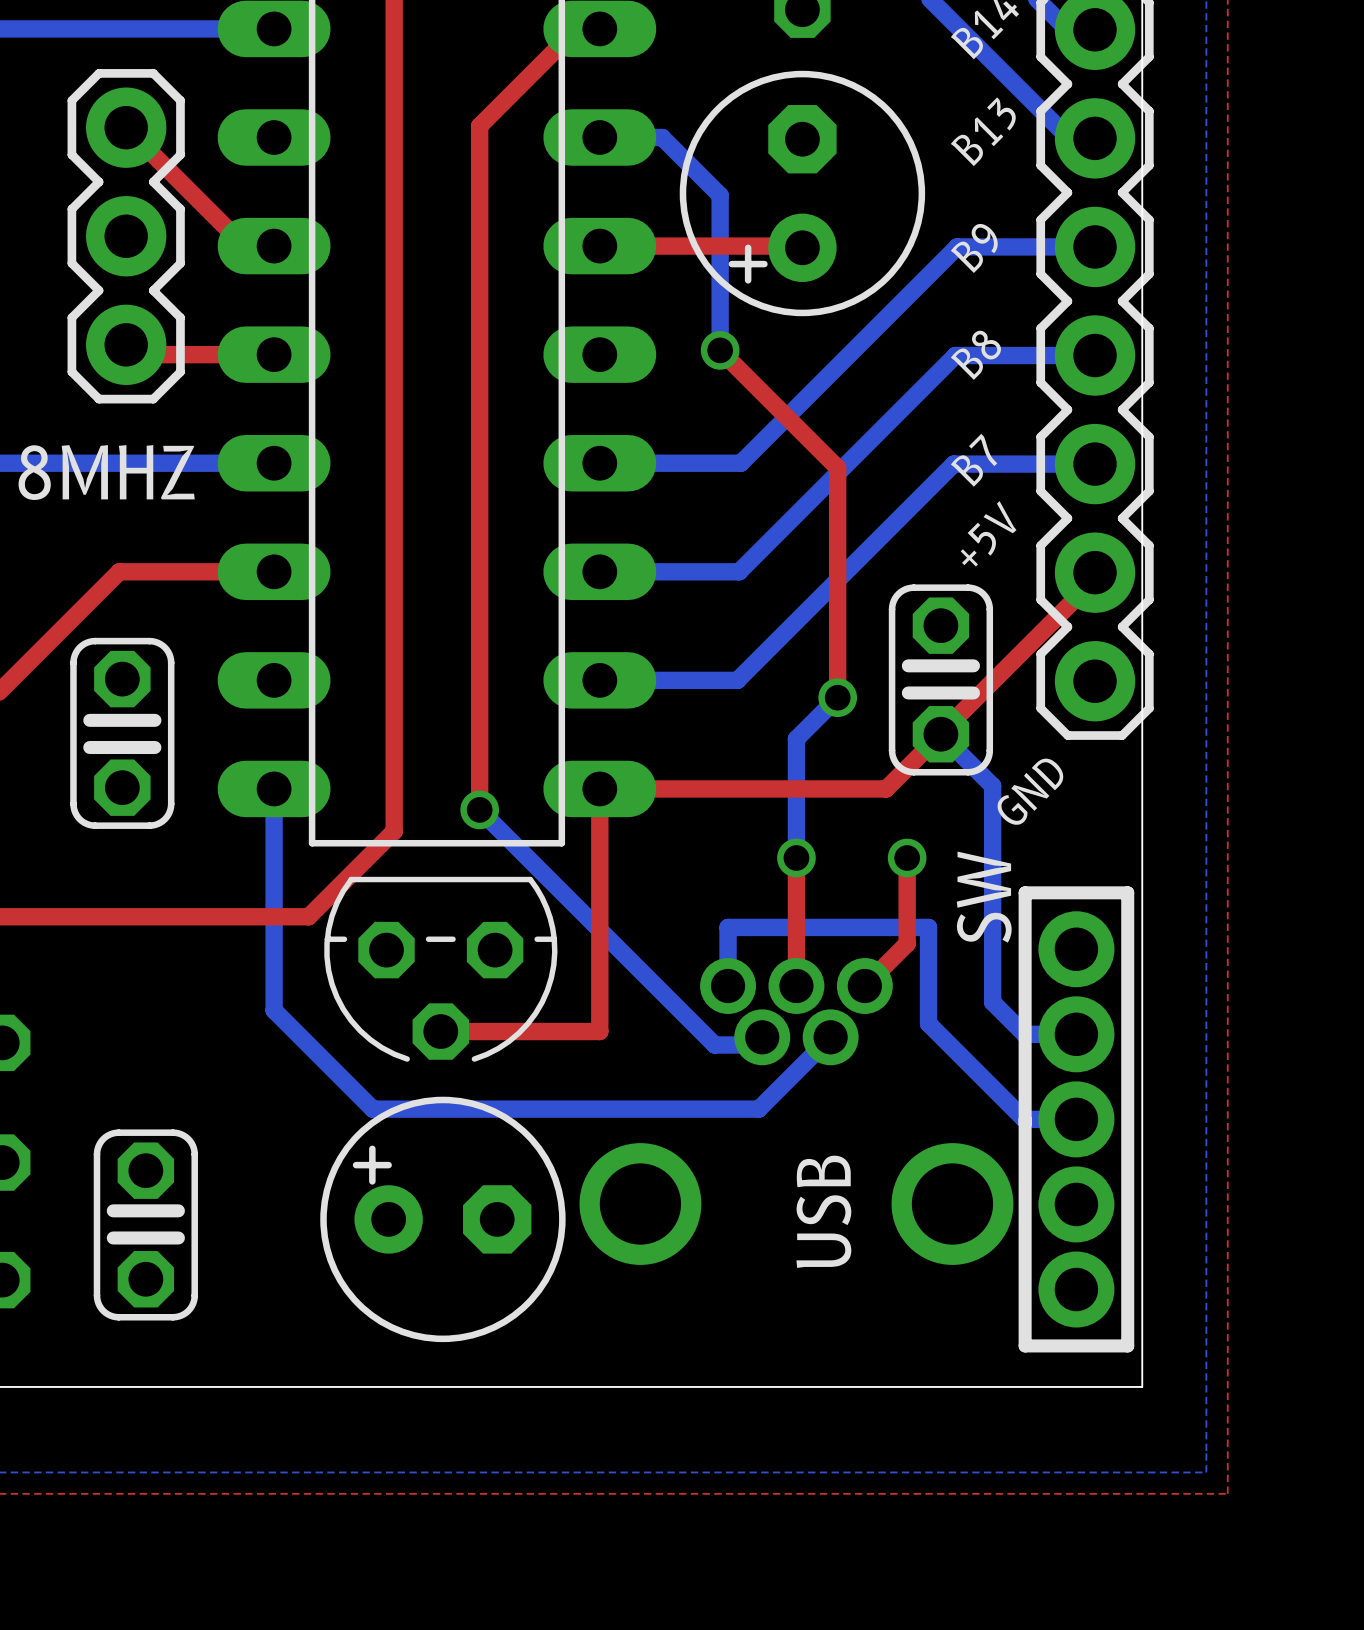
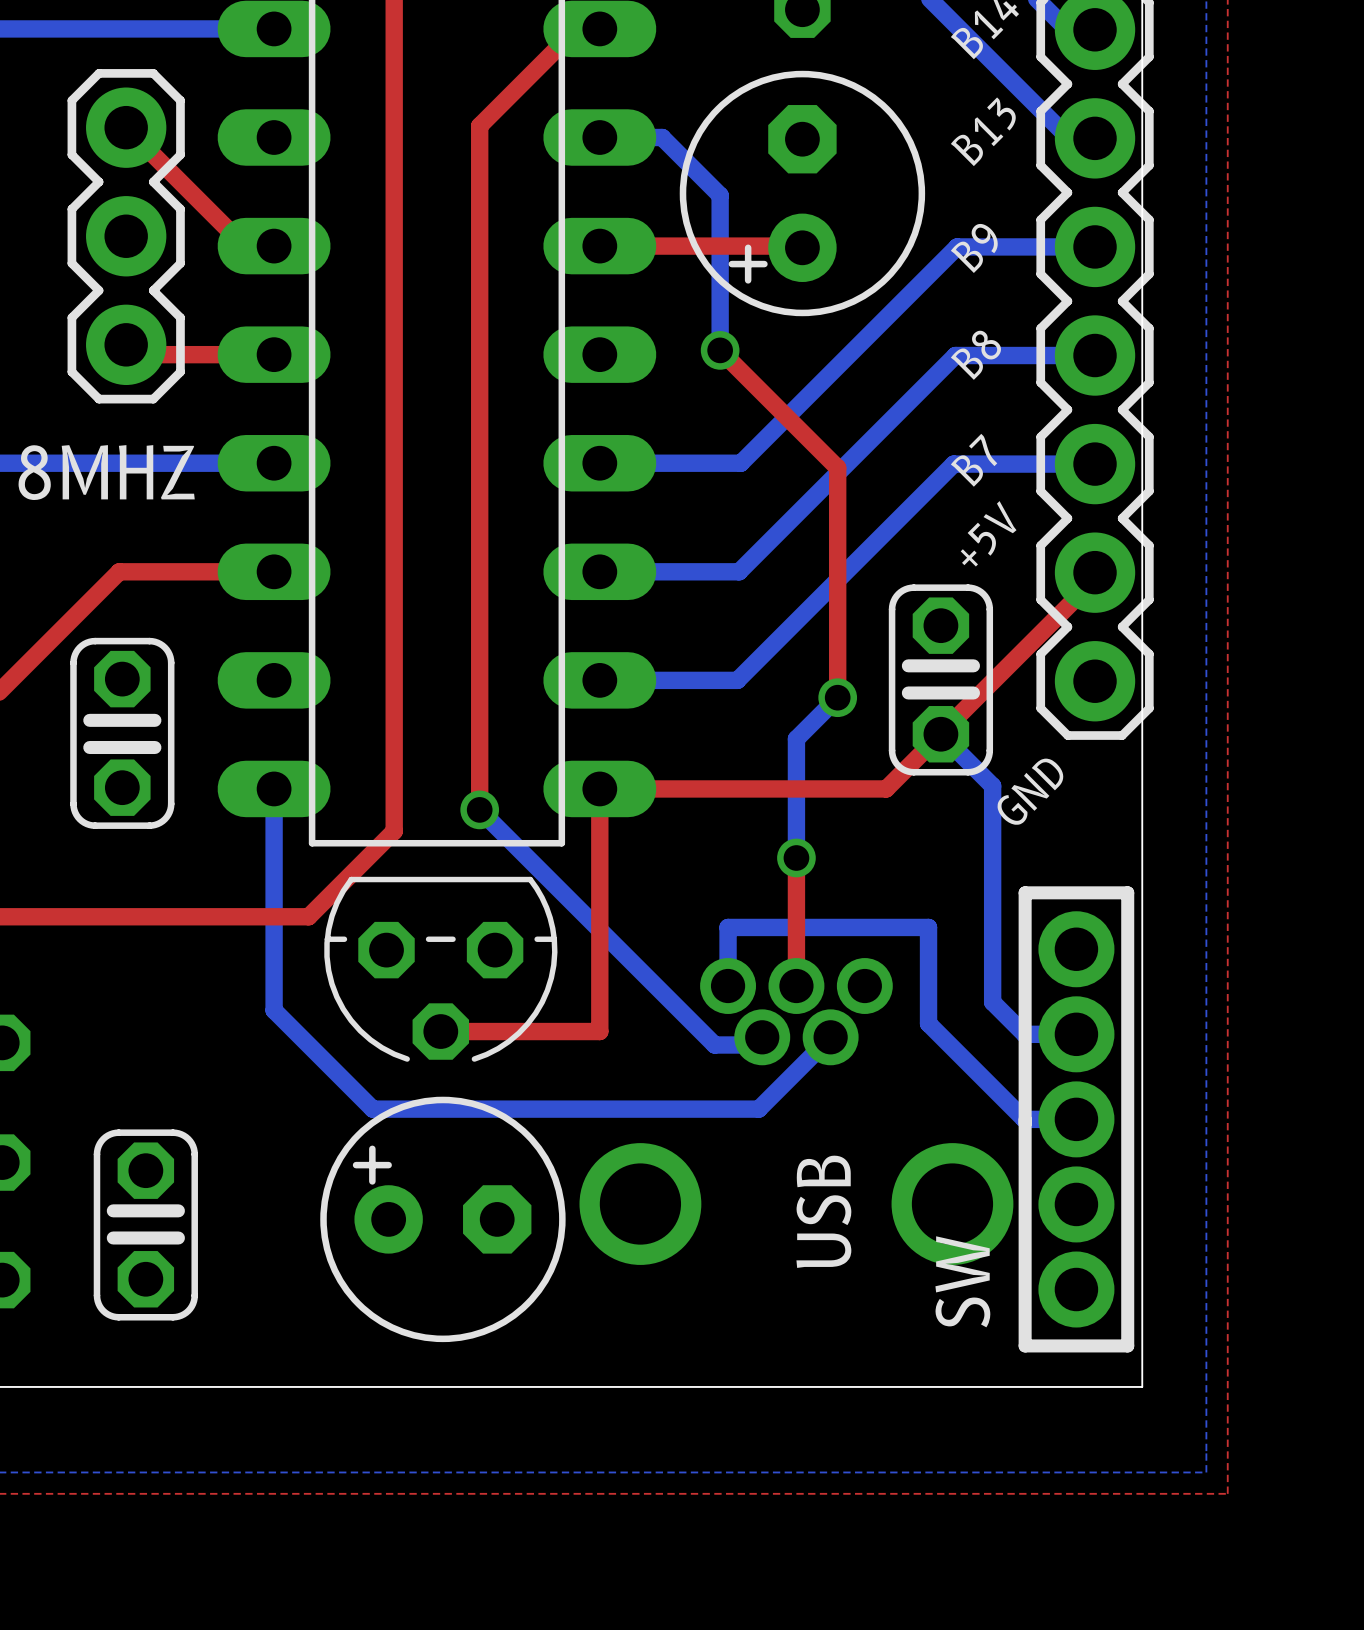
top track: (907, 857) (907, 943) (864, 986) -> none
via: (907, 857) -> none
SW name position: SW (984, 897) -> SW (962, 1281)

